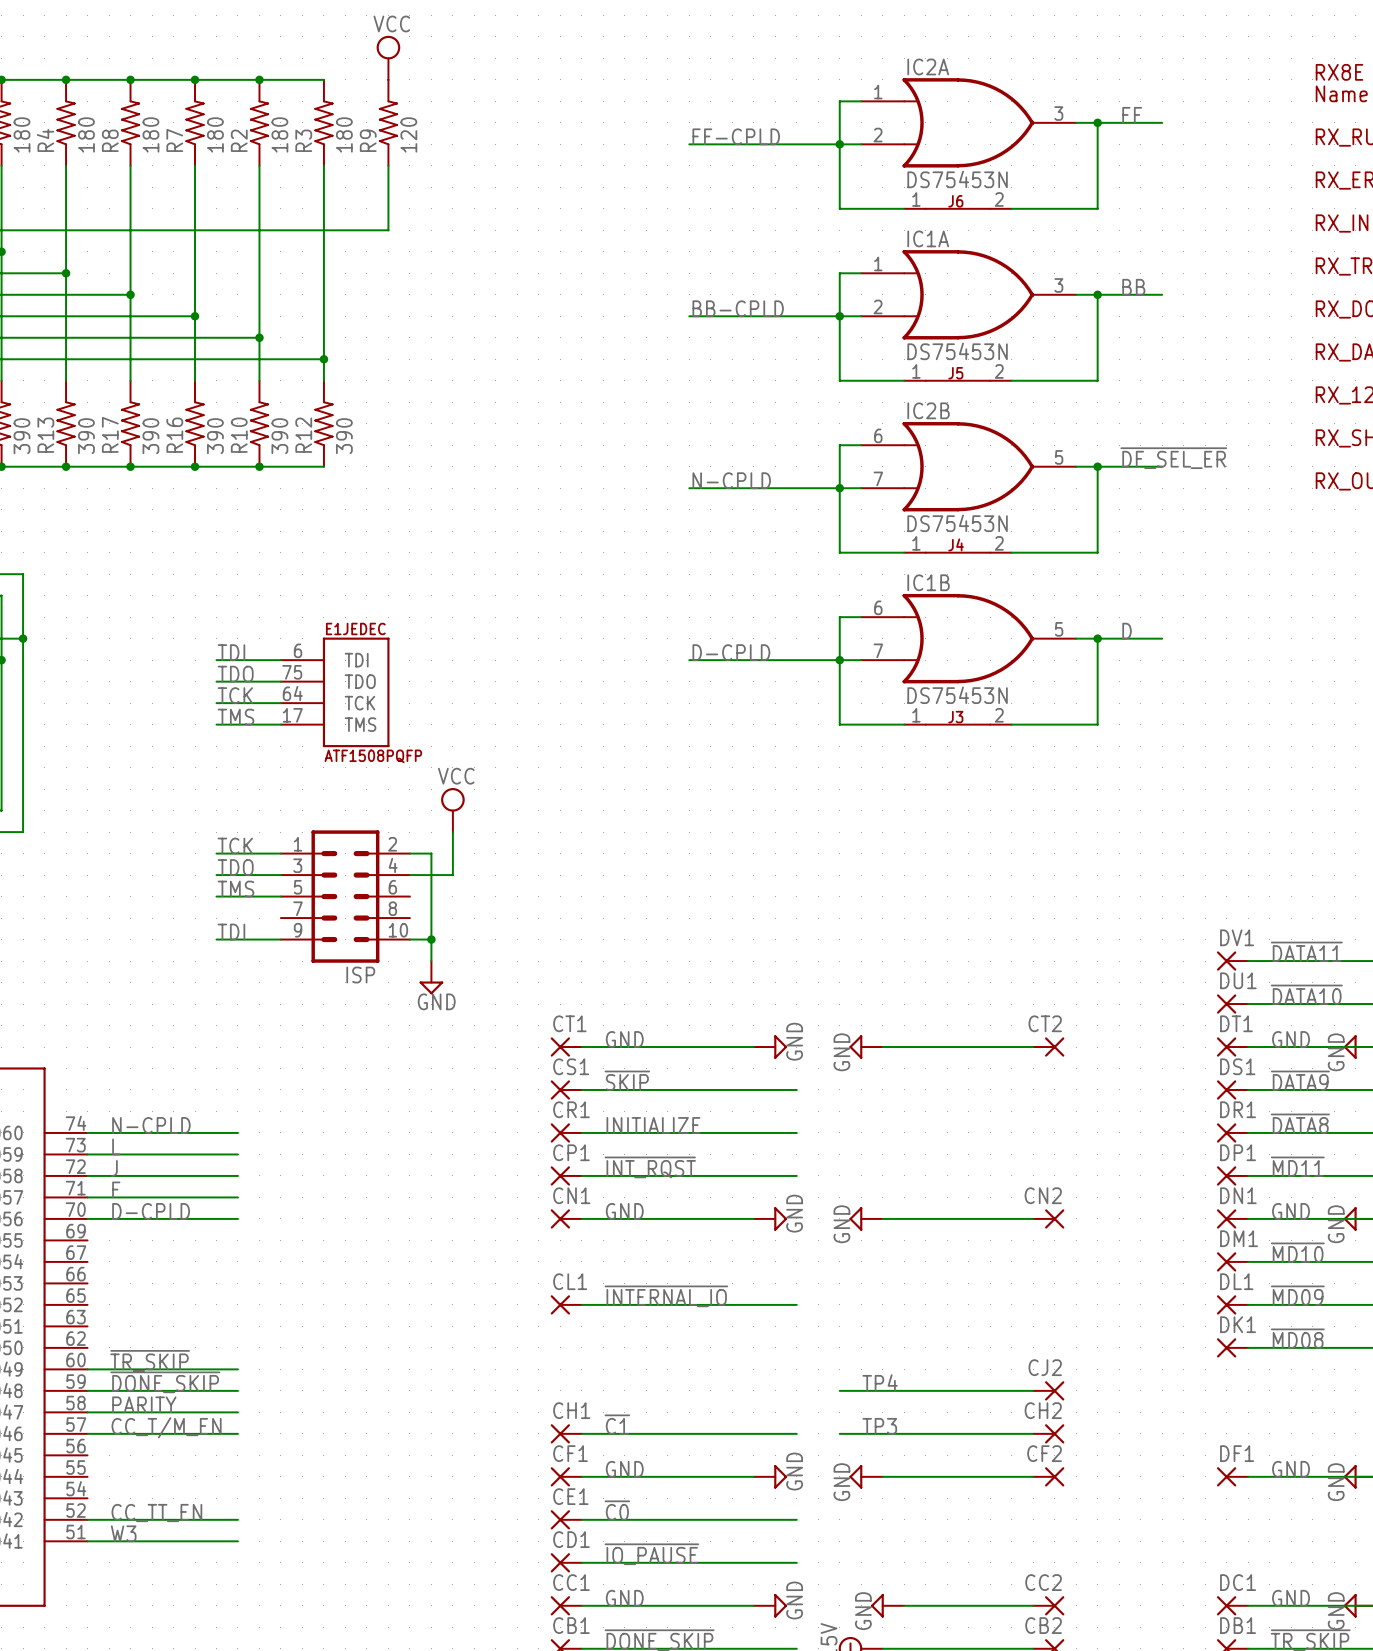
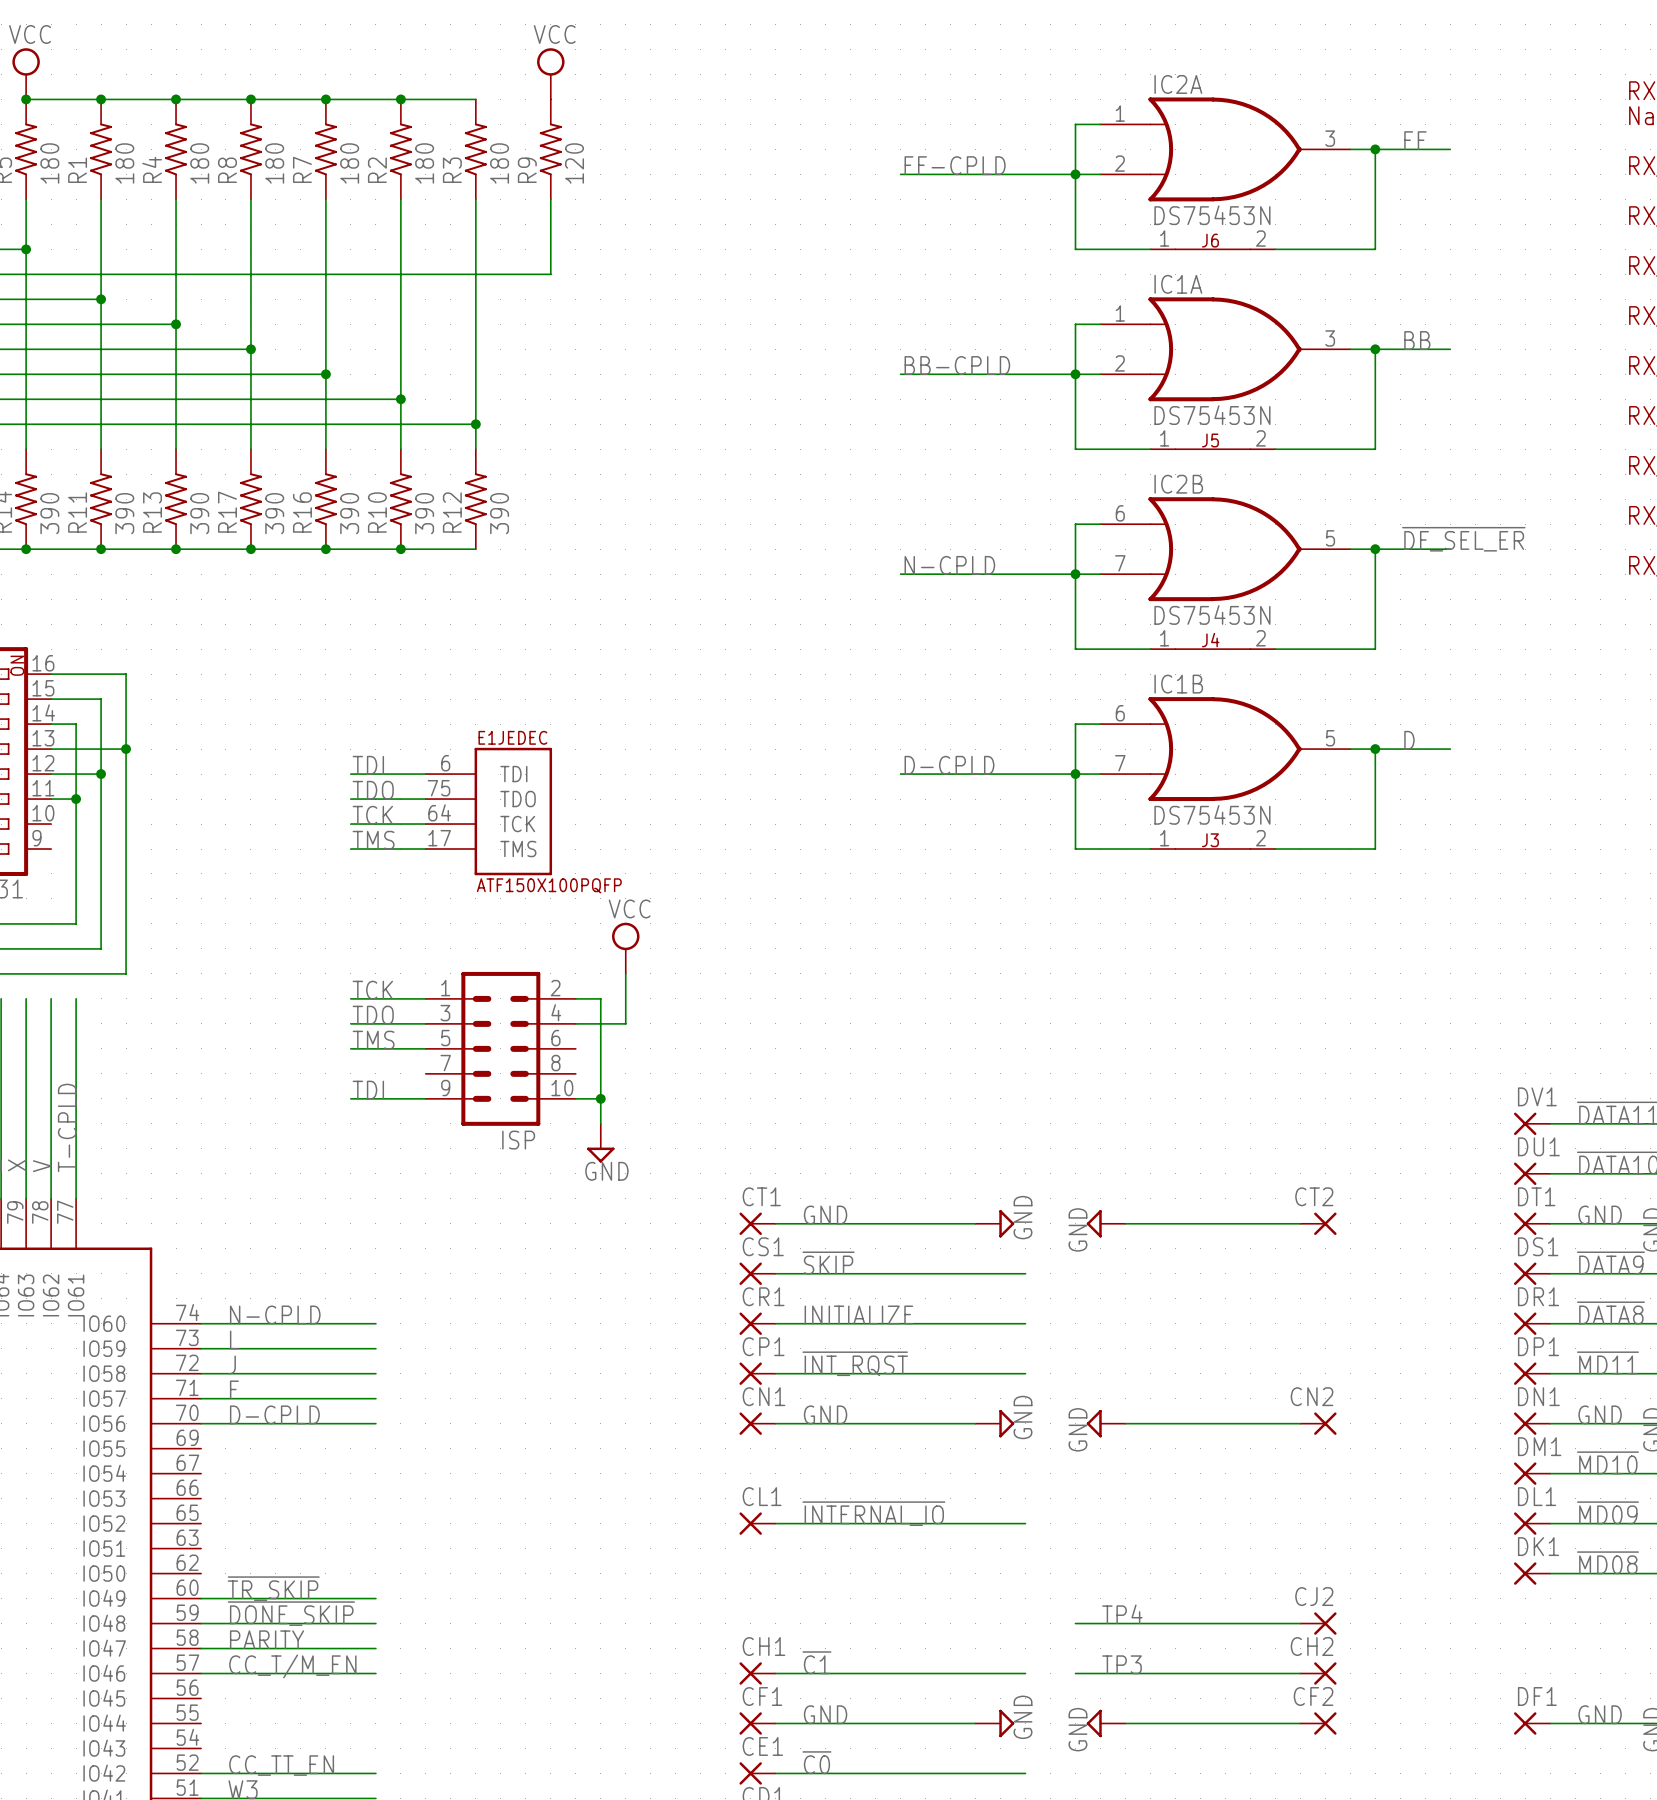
E1JEDEC value: ATF1508PQFP (373, 756) -> ATF150X100PQFP (549, 885)

